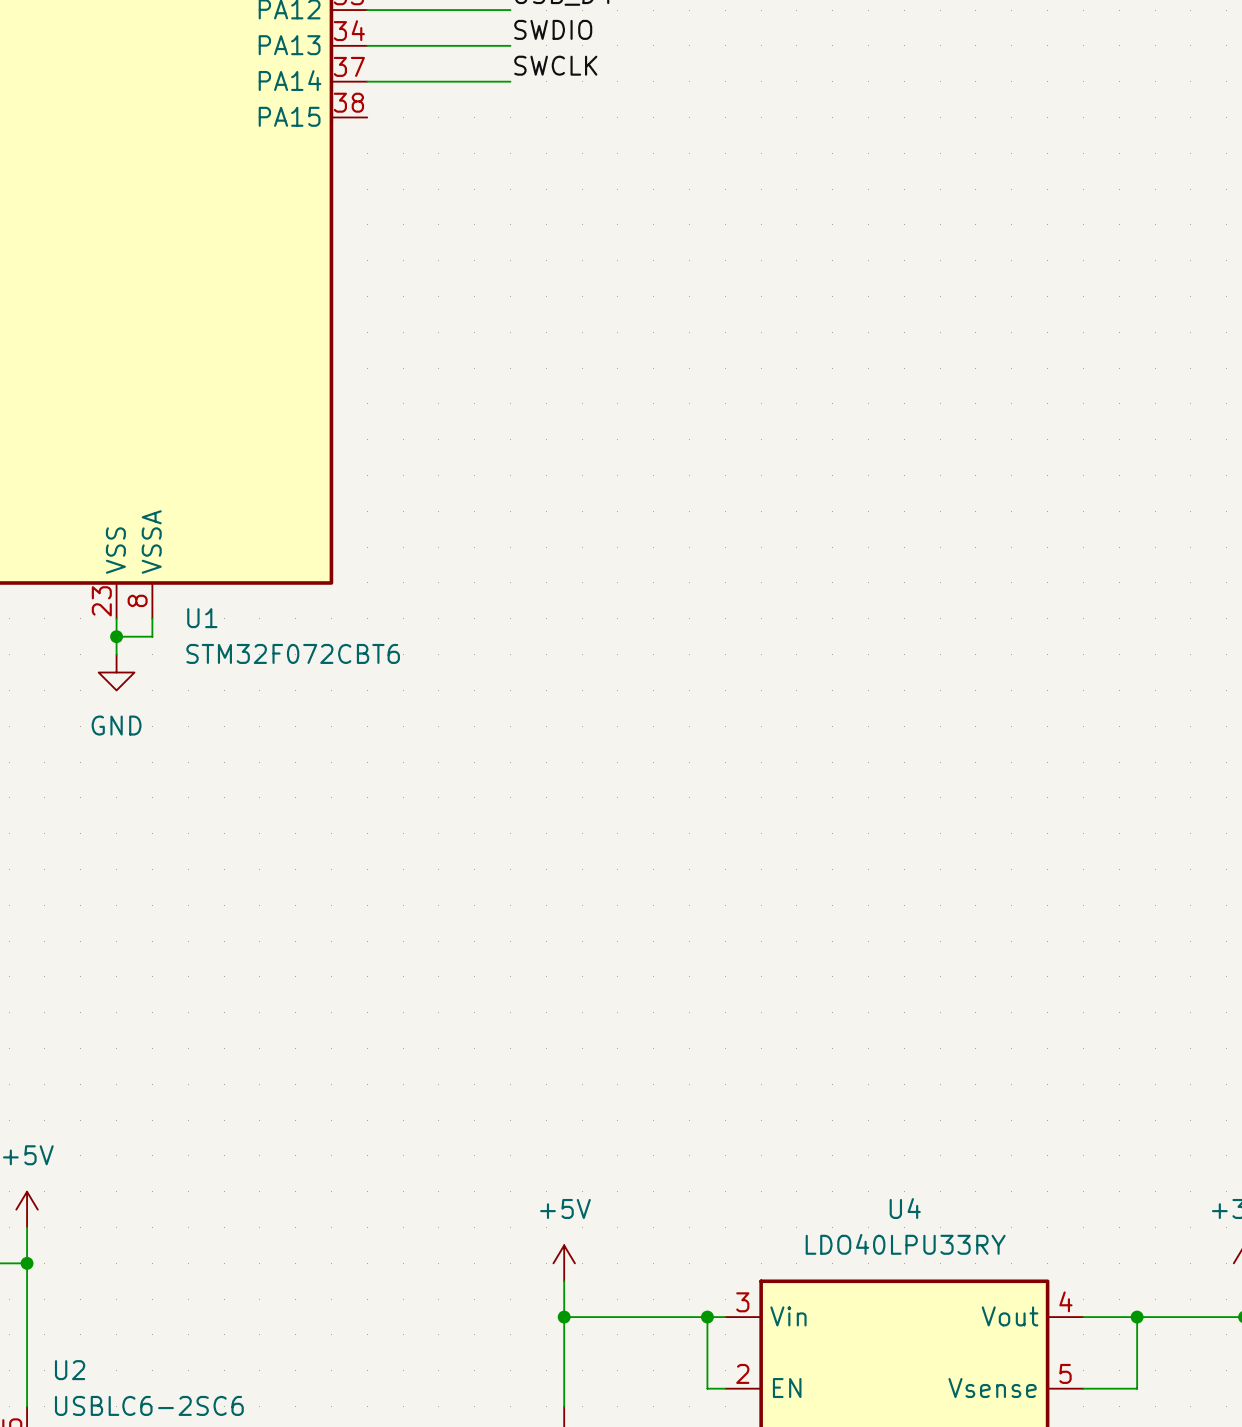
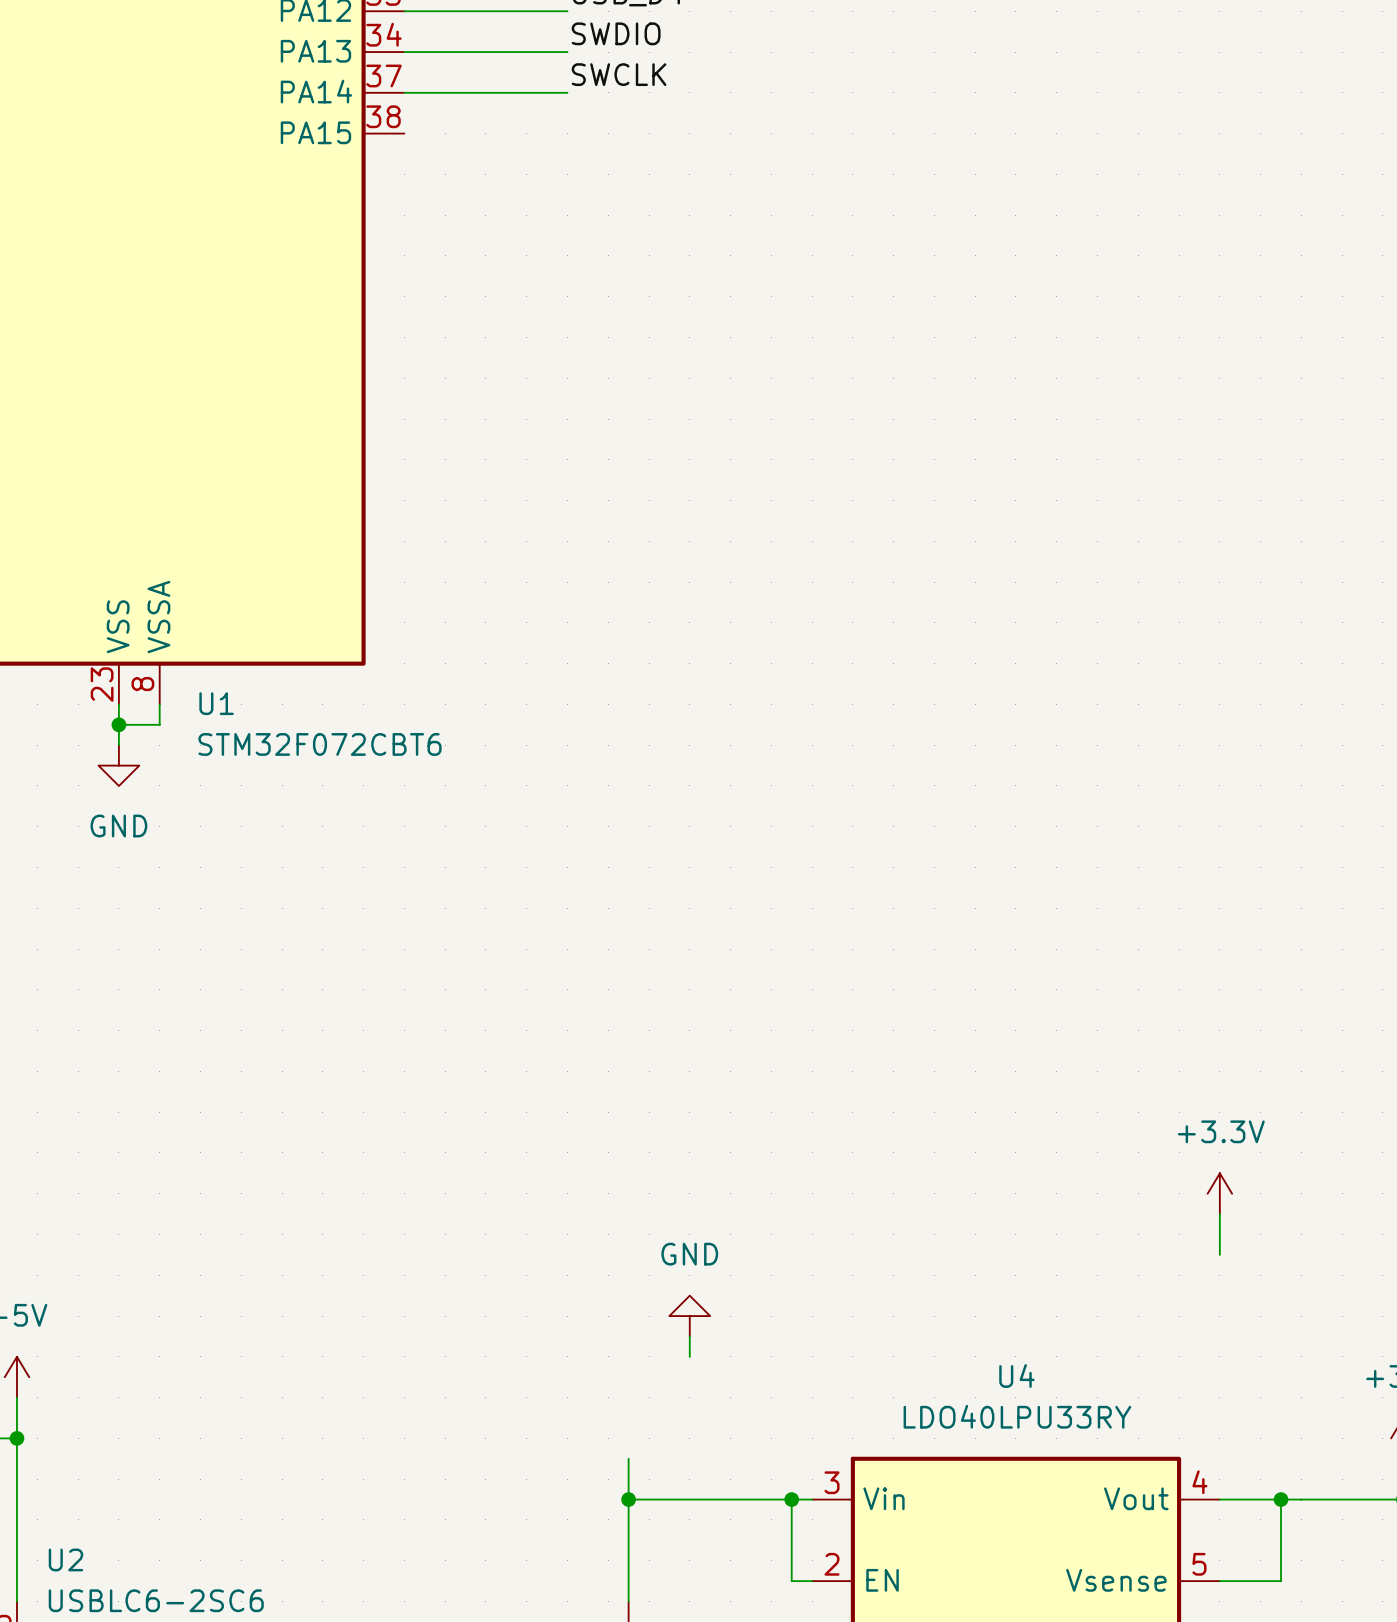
power symbol: none -> +3.3V (1219, 1193)
wire: none -> (1219, 1214) (1219, 1254)
power symbol: none -> GND (689, 1316)
wire: none -> (689, 1336) (689, 1356)
power symbol: +5V (564, 1263) -> none

